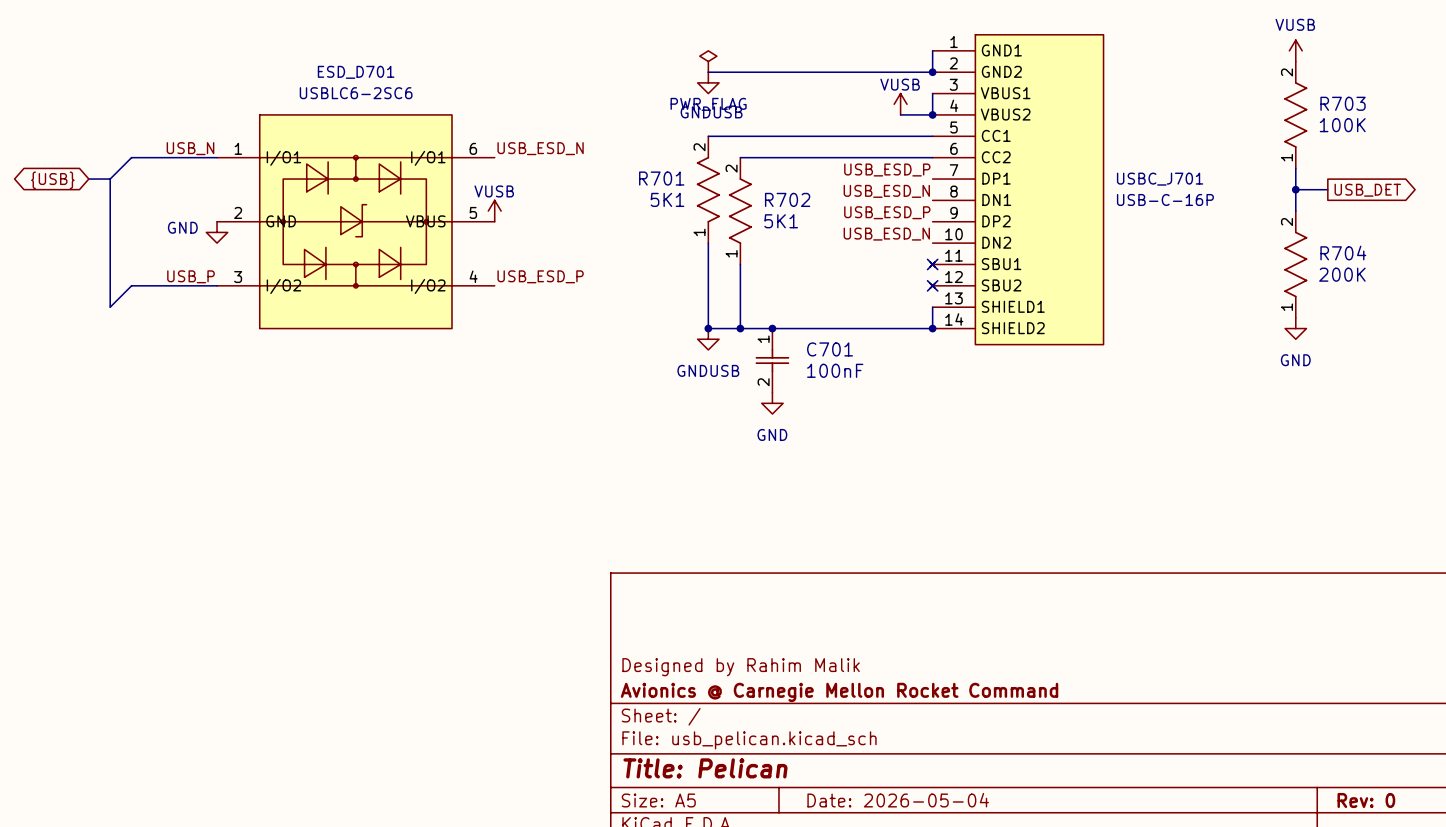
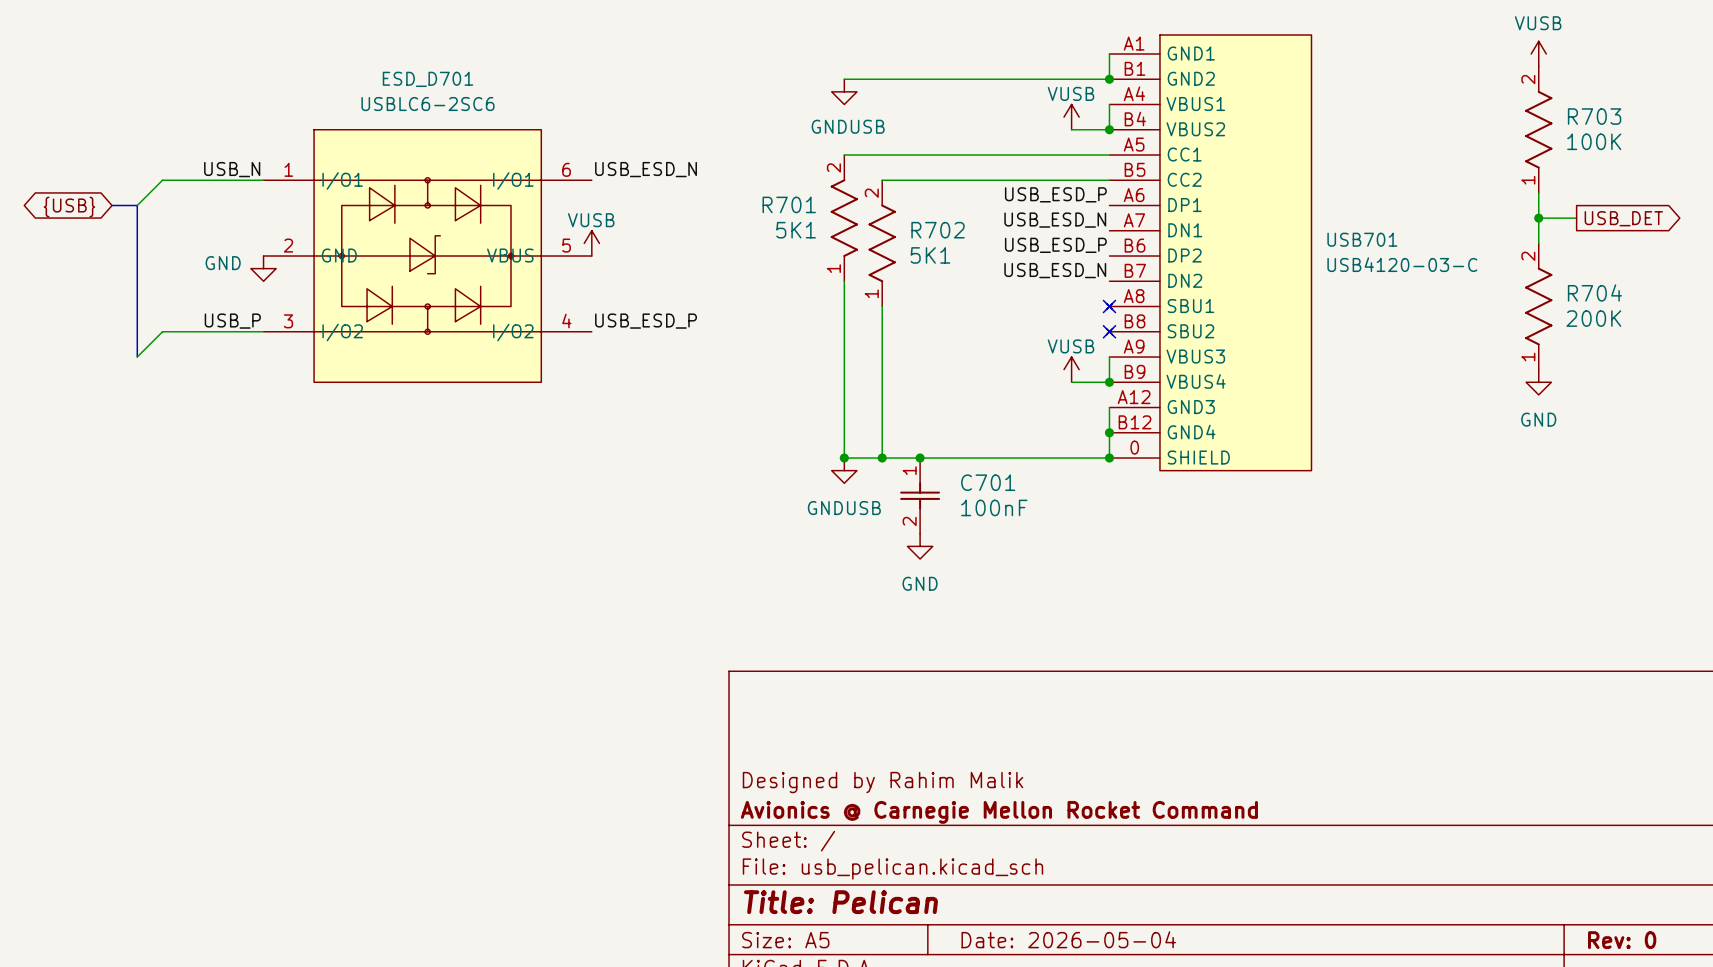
power symbol: PWR_FLAG (708, 61) -> none
USBC_J701: USB-C-16P (1016, 189) -> none
USB701: none -> USB4120-03-C (1208, 252)
power symbol: none -> VUSB (1071, 369)
wire: (708, 328) (900, 328) -> (844, 382) (844, 458) (1109, 458) (1109, 407)
junction: (708, 328) -> none
wire: none -> (882, 382) (882, 458)
junction: (740, 328) -> none
junction: (772, 328) -> none
power symbol position: GNDUSB (708, 339) -> GNDUSB (844, 470)
C701 position: (772, 360) -> (920, 495)
junction: none -> (1109, 432)
junction: none -> (844, 458)
junction: none -> (882, 458)
junction: none -> (920, 458)
junction: none -> (1109, 458)
power symbol position: GND (772, 403) -> GND (920, 546)

